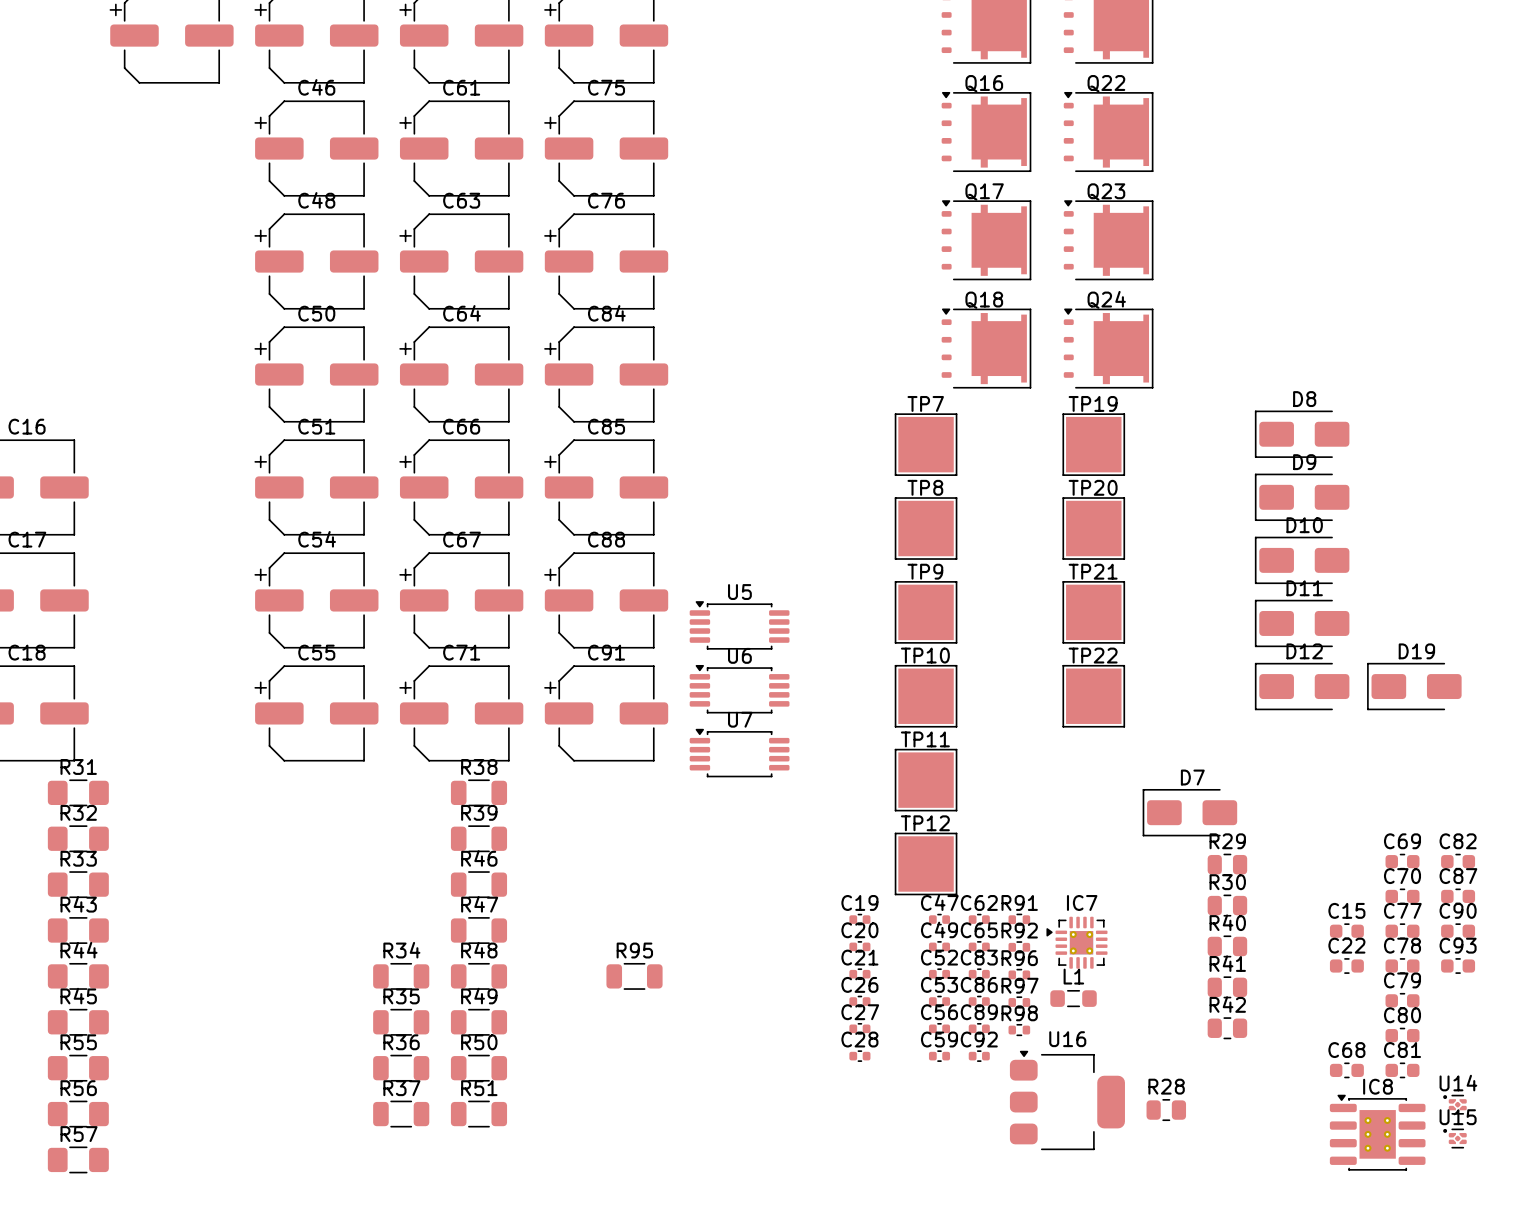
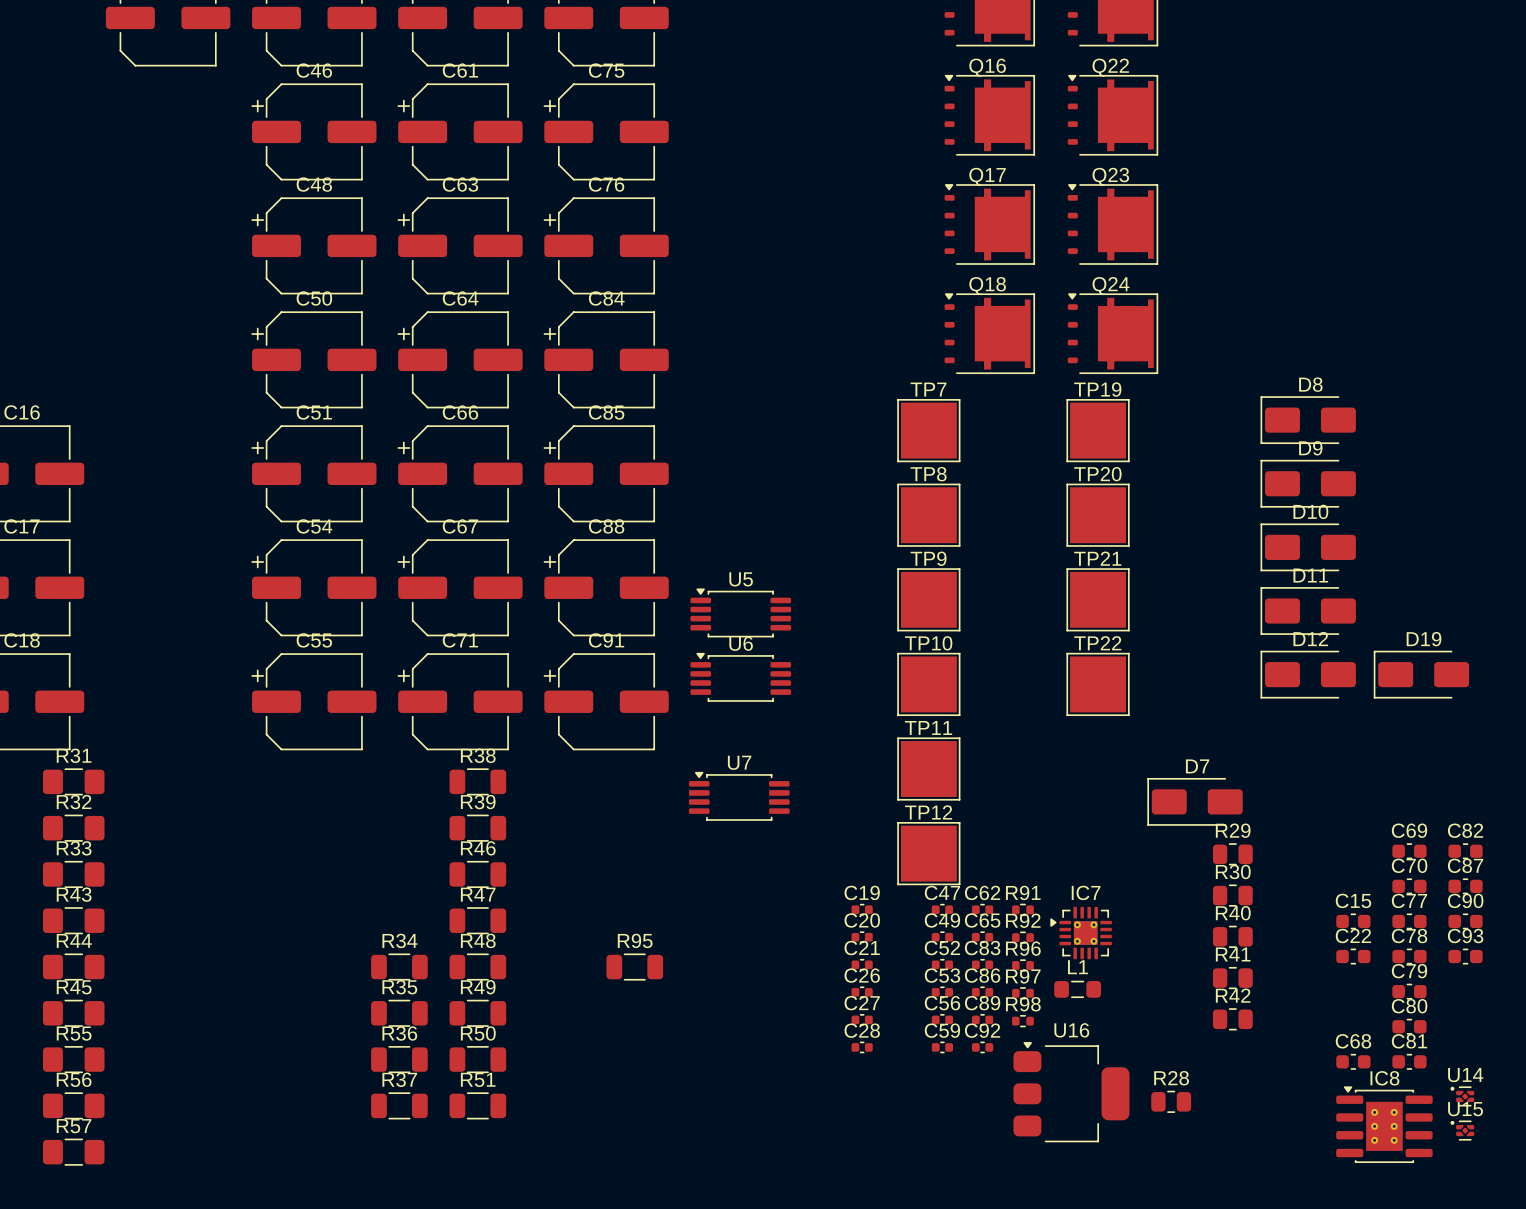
U7 position: (739, 753) -> (739, 796)

